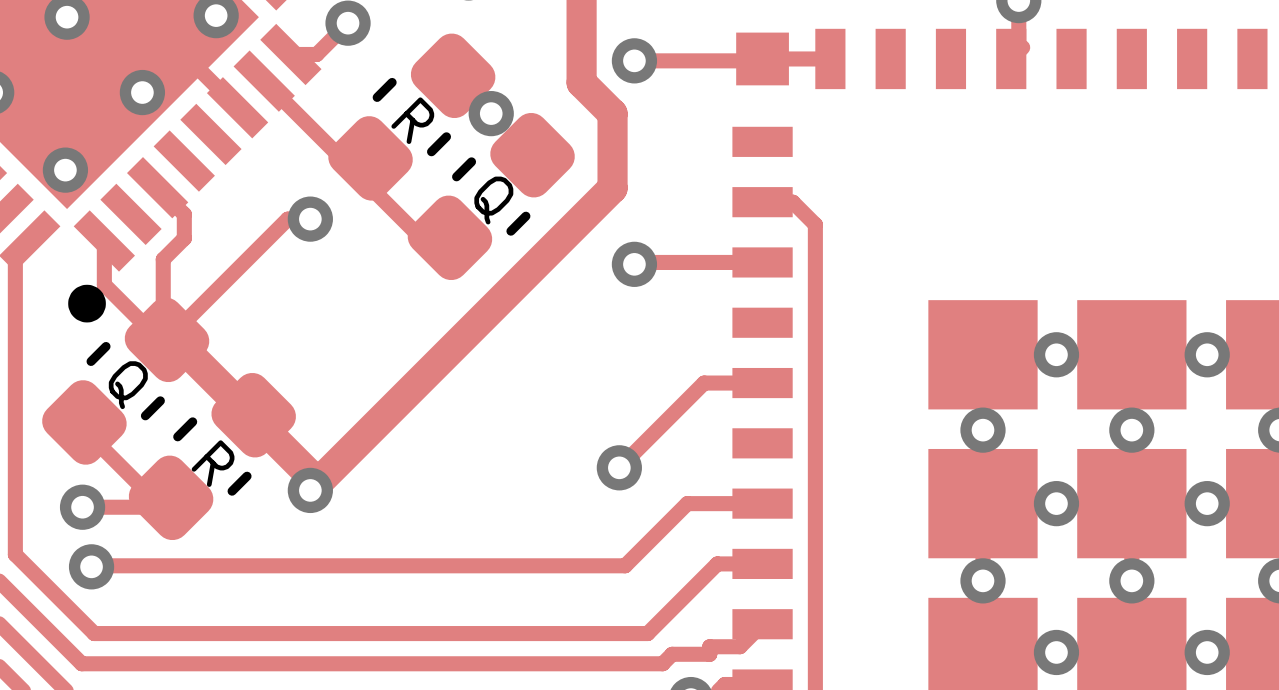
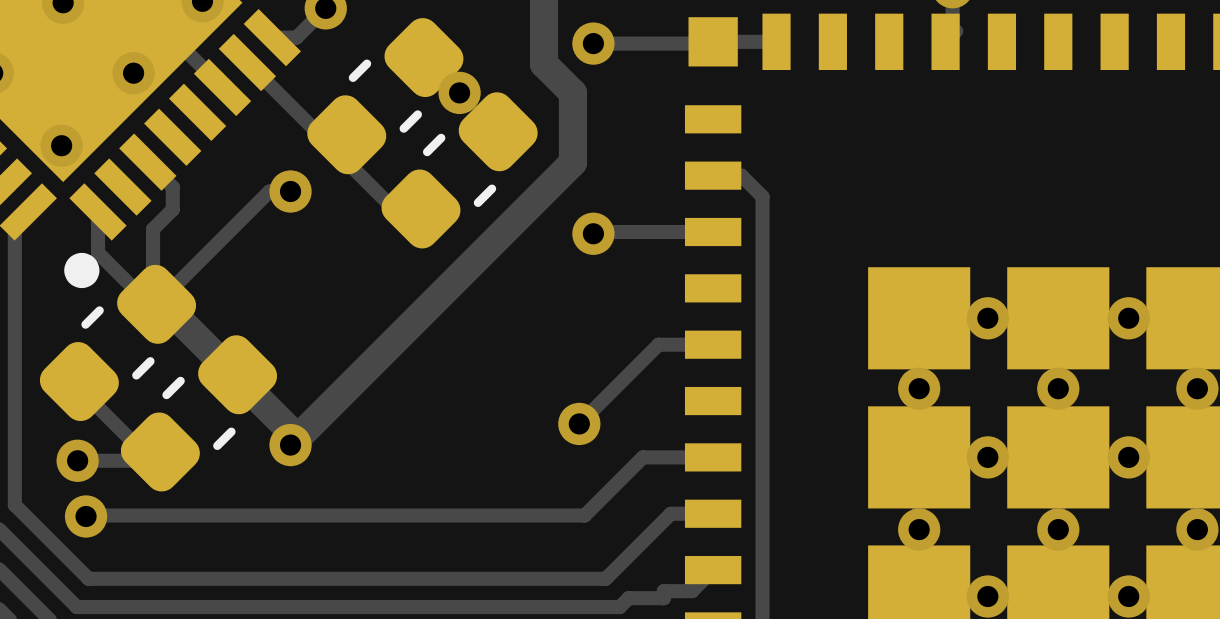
text: R (412, 120) -> none
text: Q (493, 200) -> none
text: Q (128, 385) -> none
text: R (213, 463) -> none

